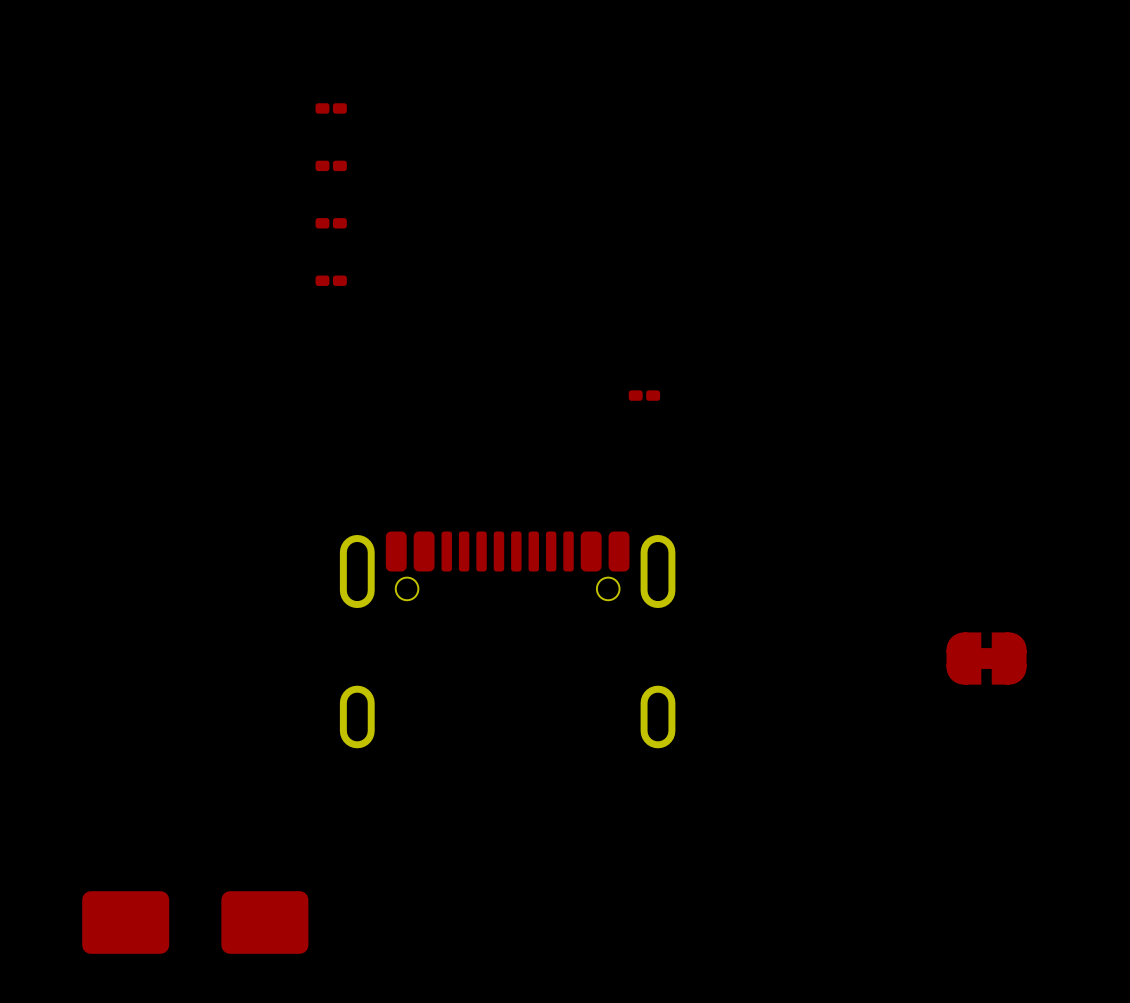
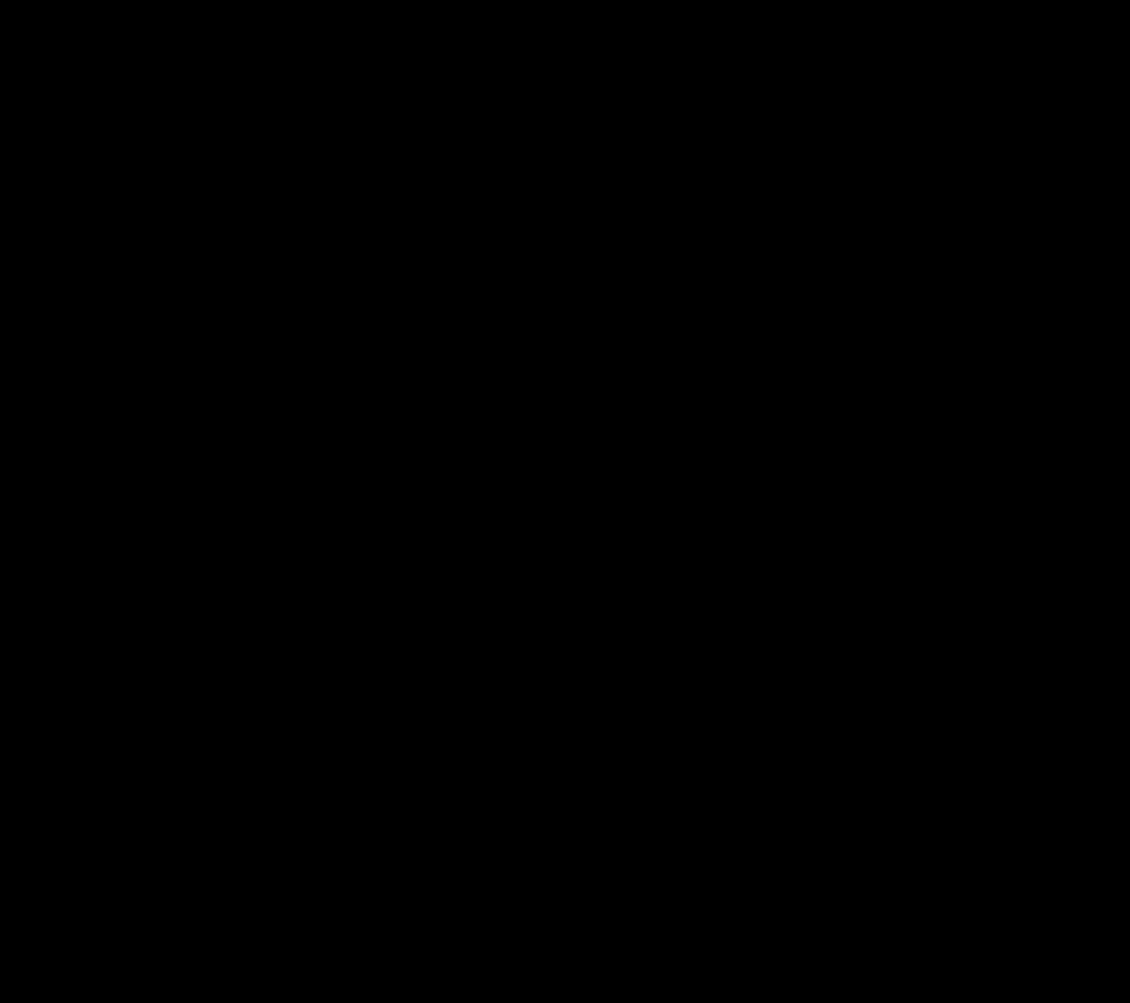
part: (331, 108) -> none
part: (331, 165) -> none
part: (331, 223) -> none
part: (331, 280) -> none
part: (644, 395) -> none
part: (507, 639) -> none
part: (986, 658) -> none
part: (195, 922) -> none

